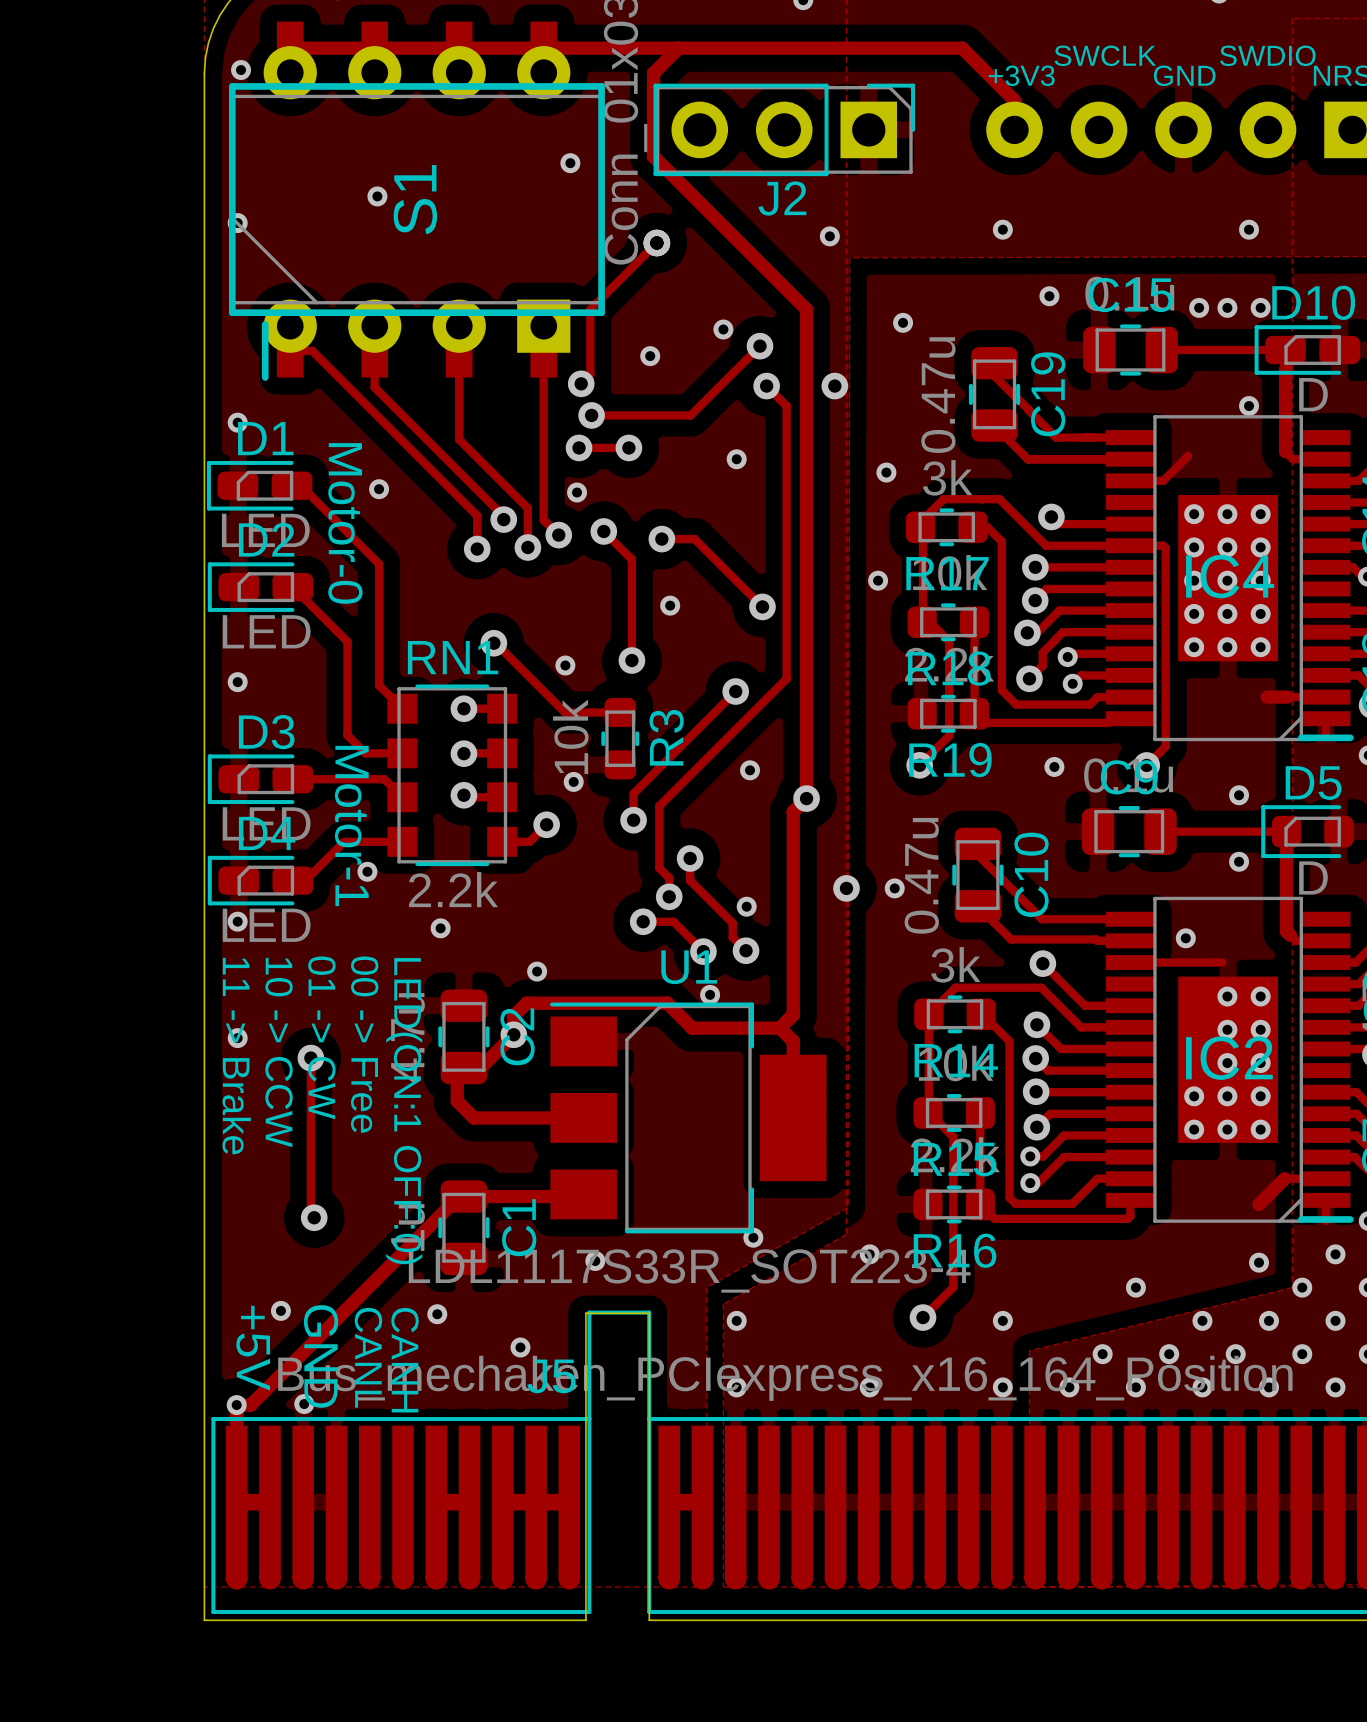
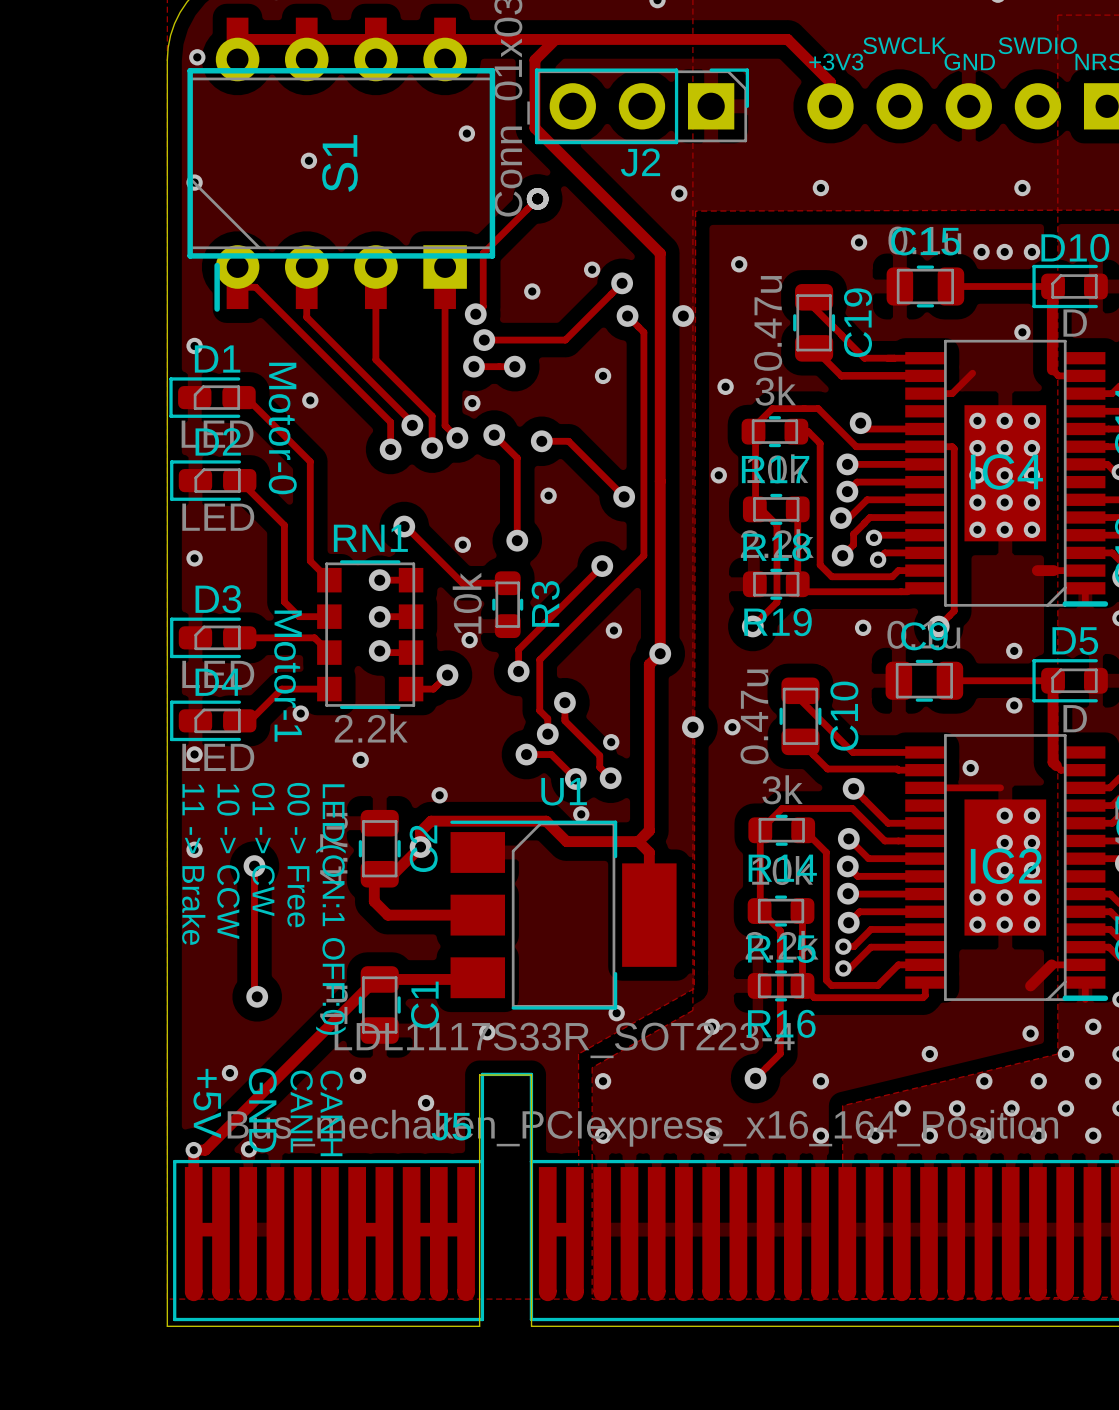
D10 footprint: [1254, 325, 1361, 375] -> [1032, 264, 1108, 309]

